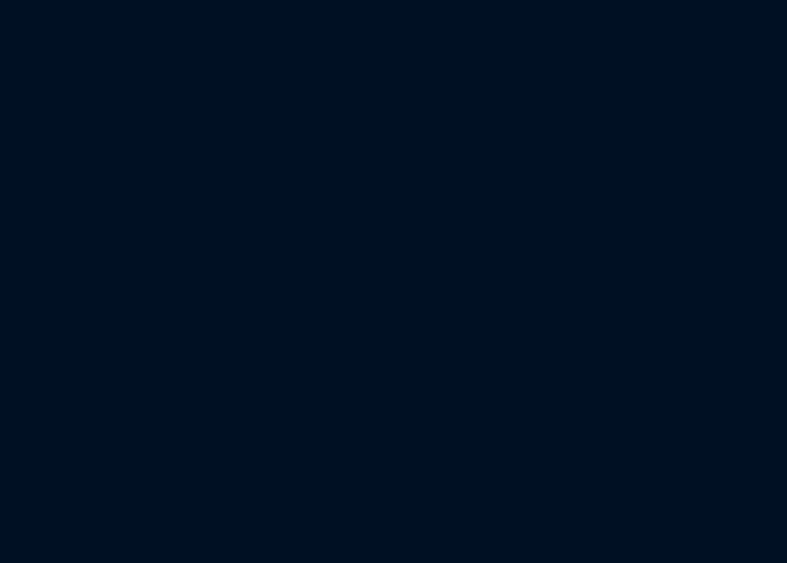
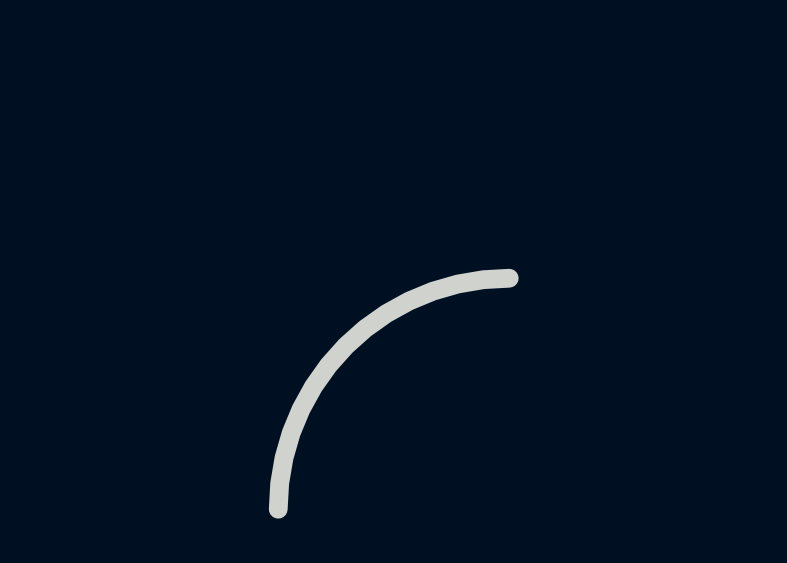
board edge: none -> (509, 278) (483, 279) (432, 291) (386, 313) (345, 345) (313, 386) (291, 432) (279, 483) (278, 509)

